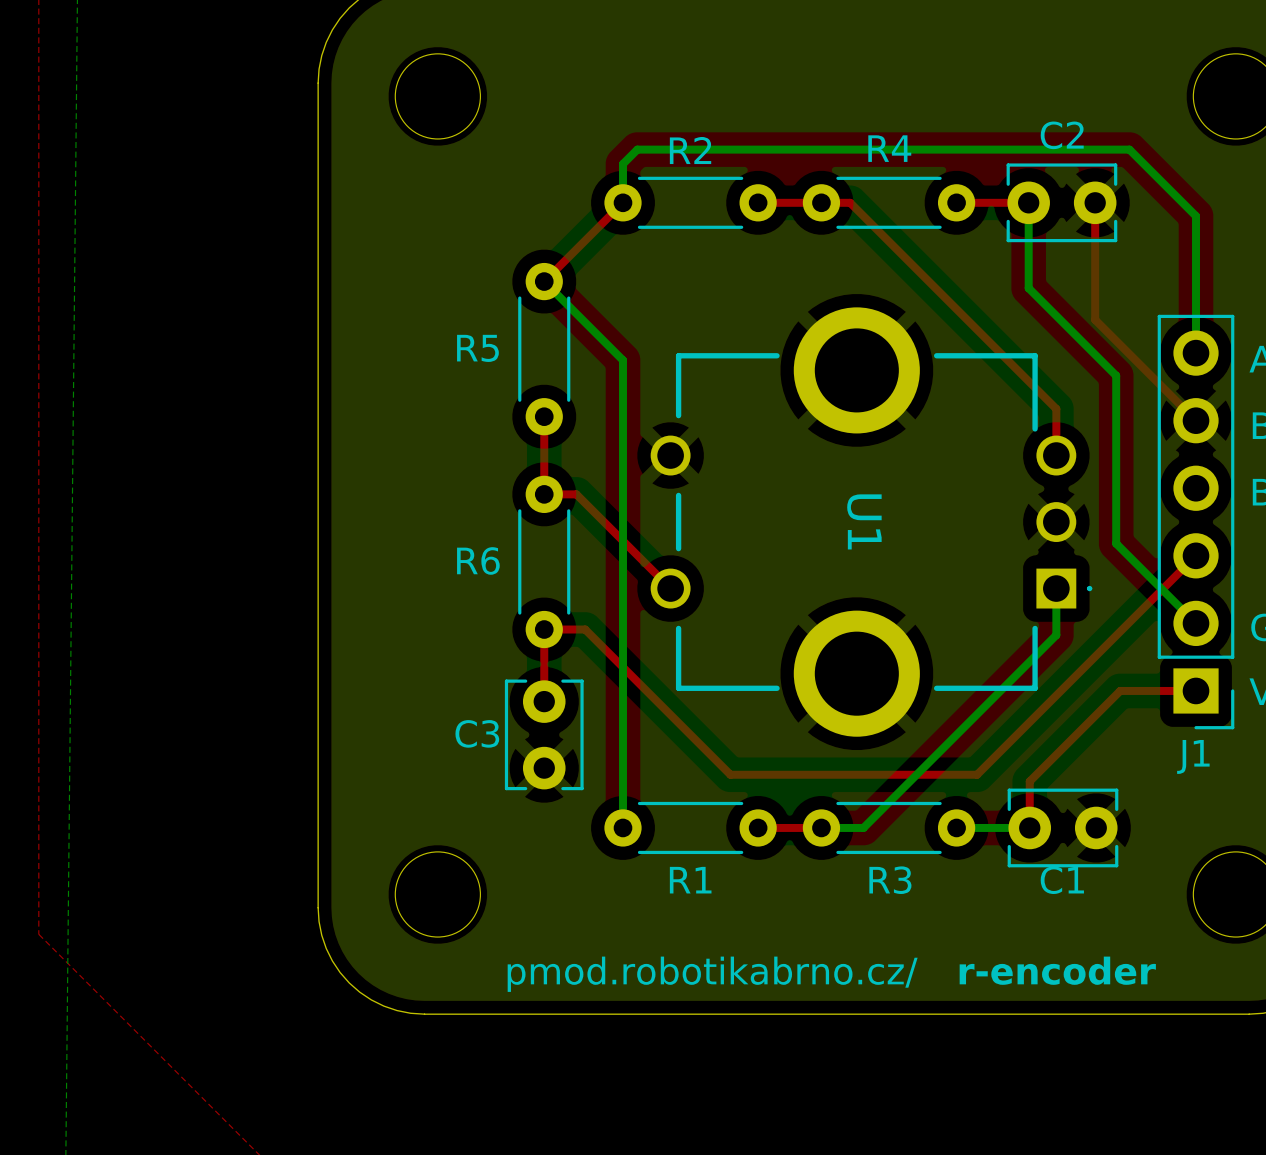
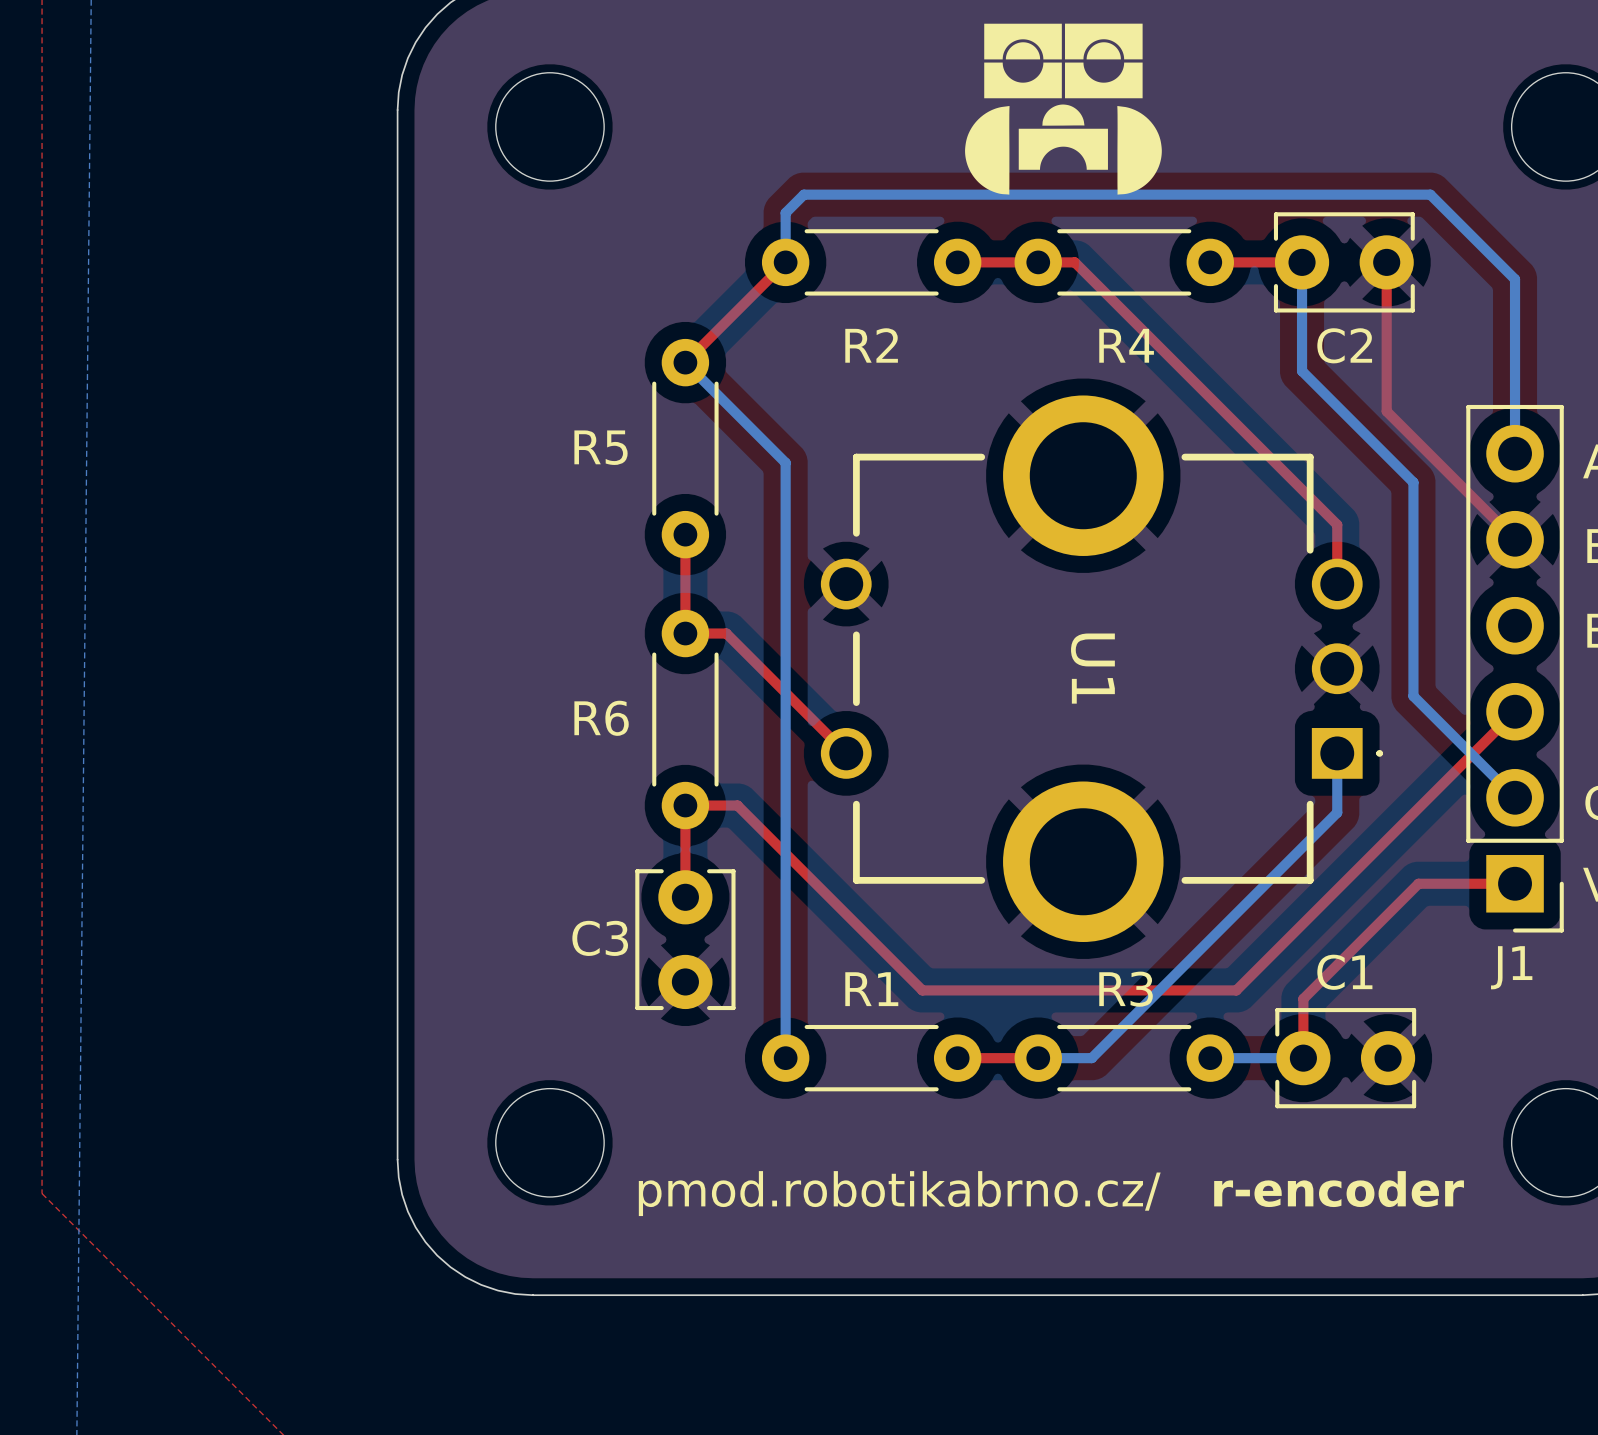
drawing: none -> [965, 23, 1162, 195]
C2 name position: C2 (1062, 135) -> C2 (1344, 345)
R4 name position: R4 (889, 148) -> R4 (1126, 345)
R2 name position: R2 (690, 150) -> R2 (871, 345)
R1 name position: R1 (690, 880) -> R1 (871, 989)
R3 name position: R3 (890, 880) -> R3 (1126, 989)
C1 name position: C1 (1062, 880) -> C1 (1344, 972)
text position: r-encoder (1057, 970) -> r-encoder (1339, 1189)
text position: pmod.robotikabrno.cz/ (712, 974) -> pmod.robotikabrno.cz/ (899, 1193)

